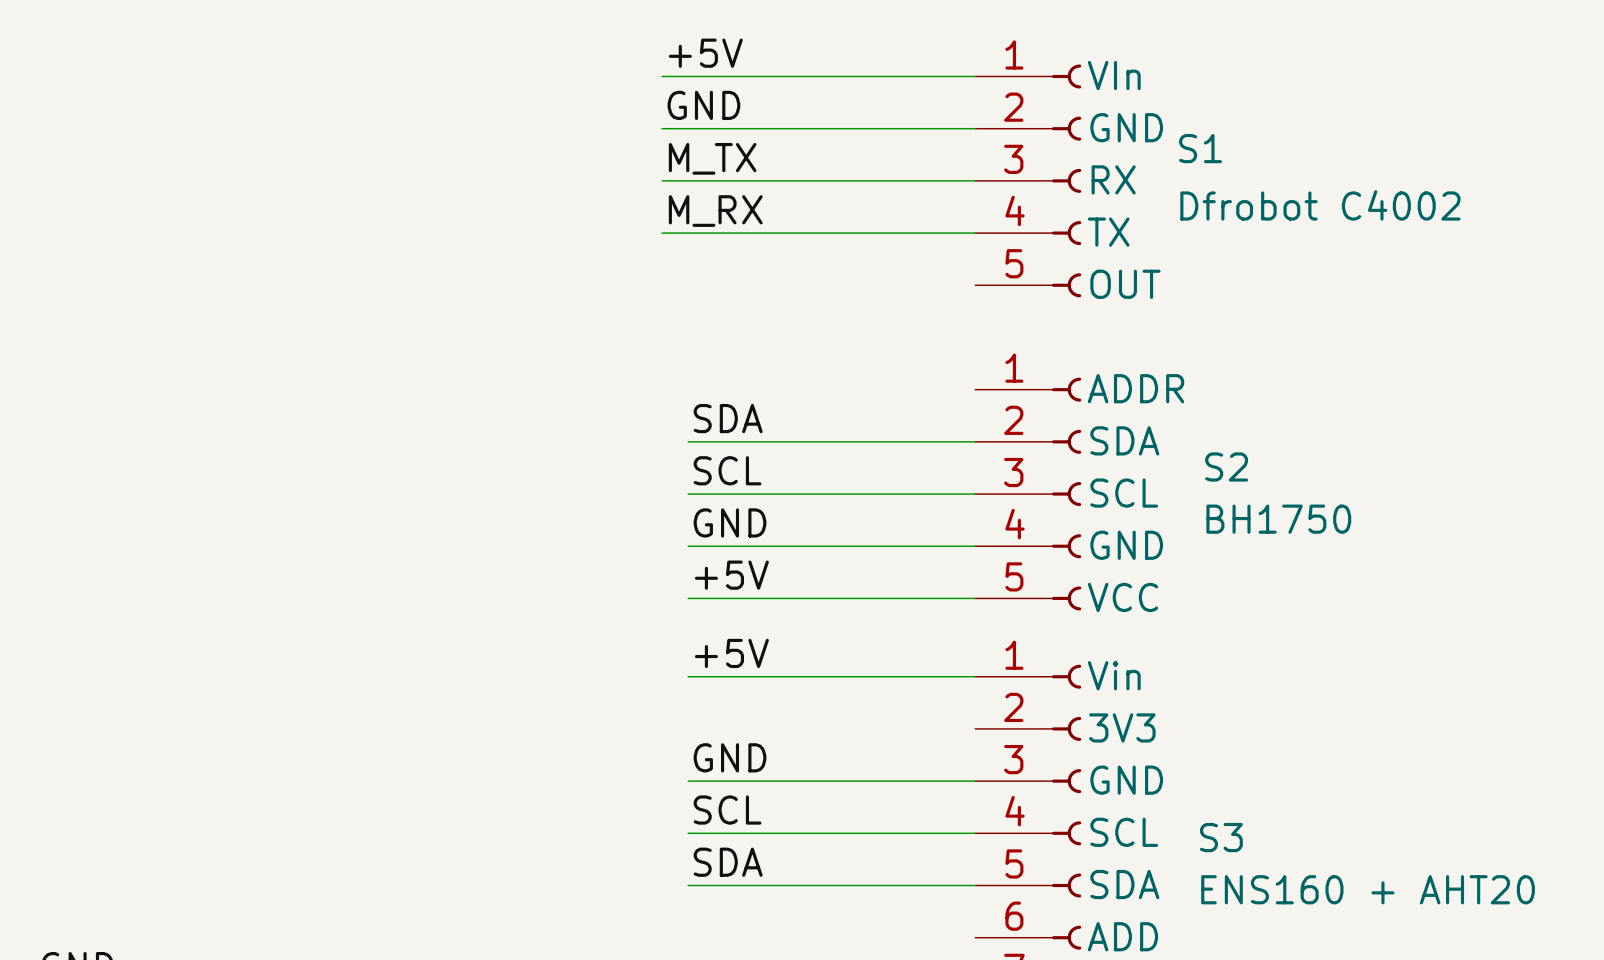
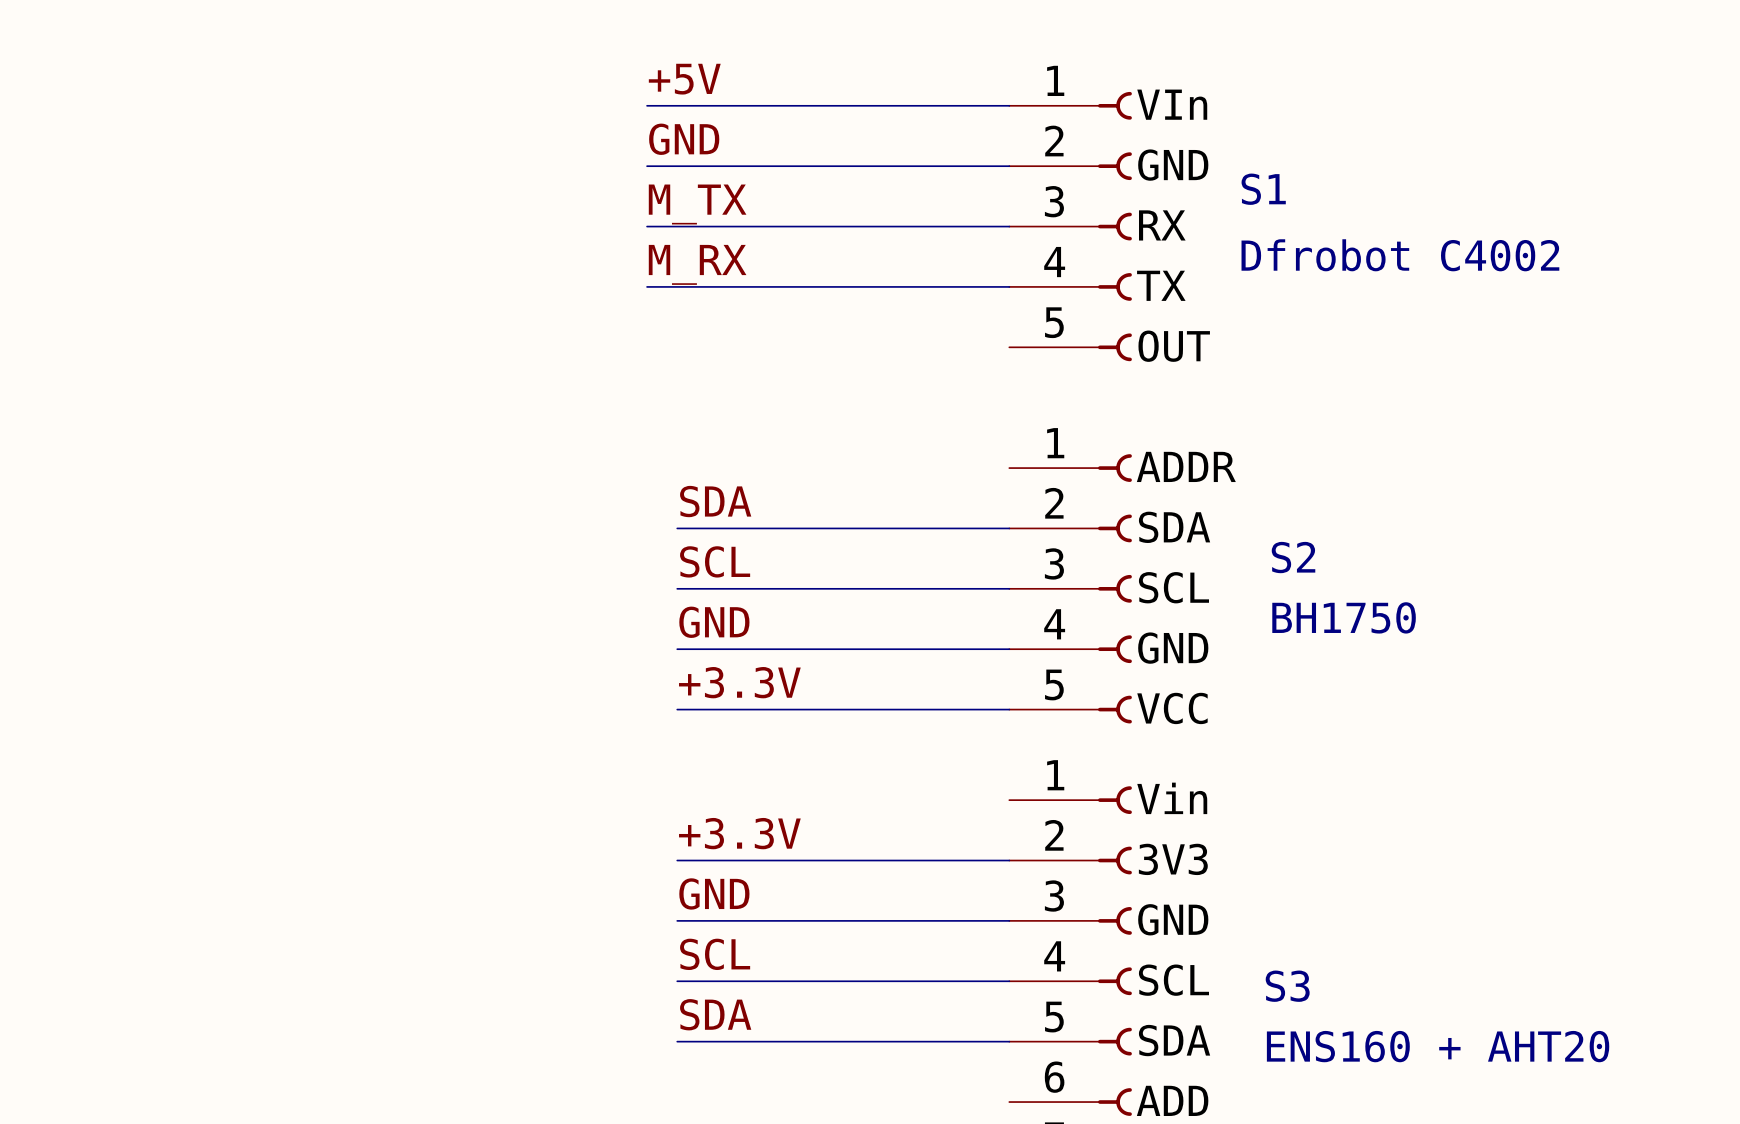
label: +5V (731, 575) -> +3.3V (739, 682)
label: +5V (731, 653) -> none
wire: (688, 676) (975, 676) -> (677, 860) (1009, 860)
label: none -> +3.3V (739, 833)

